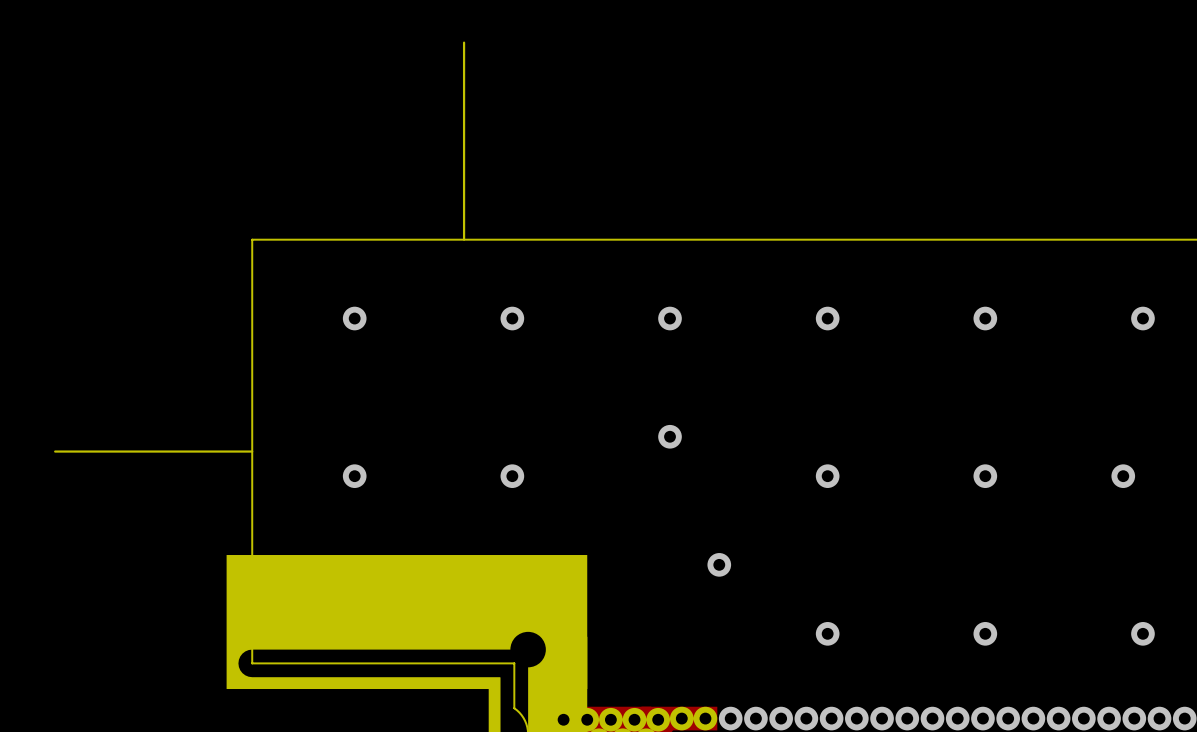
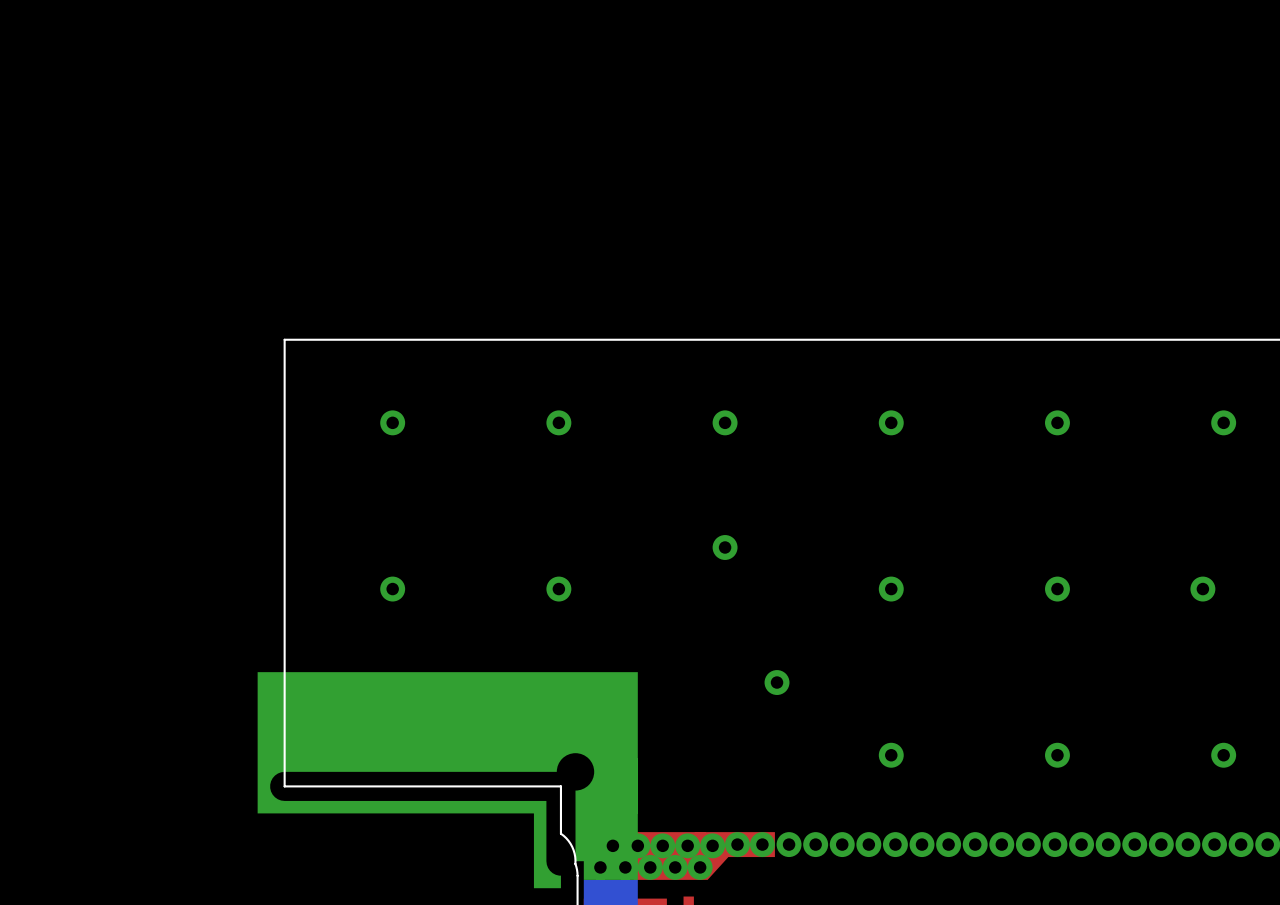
board edge: (464, 42) (464, 239) -> none
board edge: (252, 451) (55, 451) -> none

